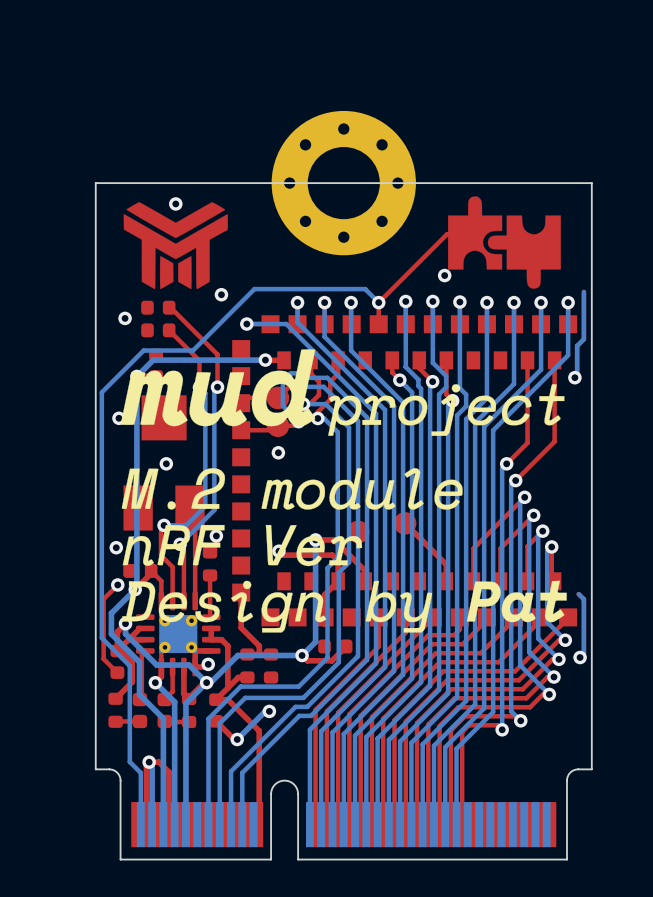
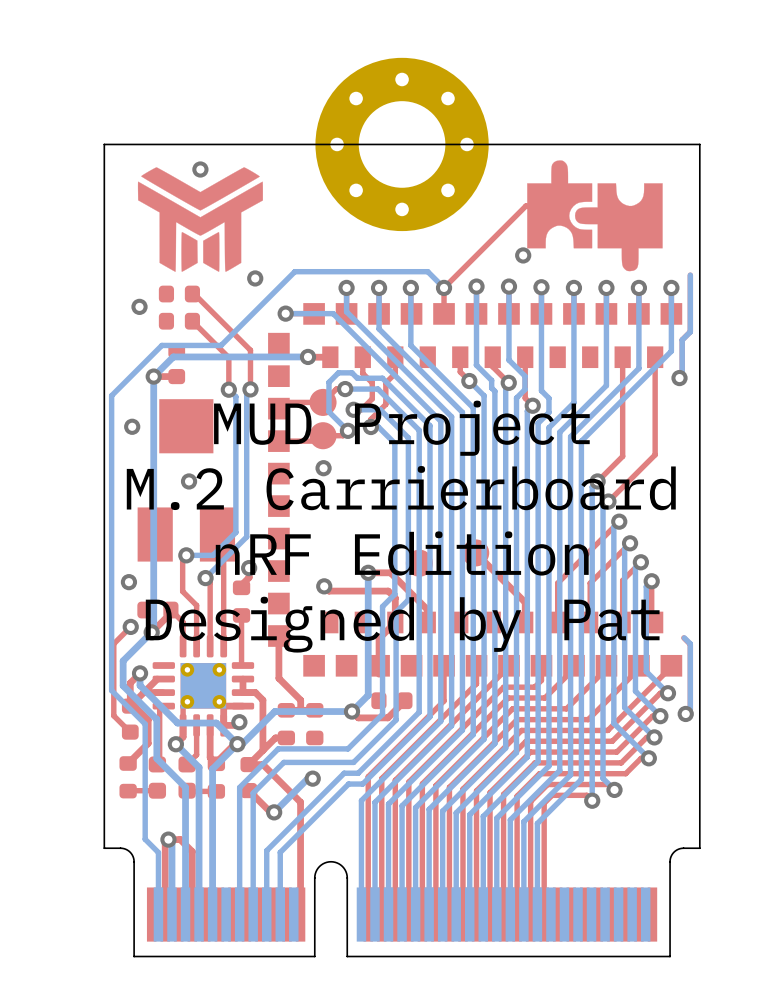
drawing: [120, 349, 567, 633] -> none
text: none -> MUD Project (401, 428)
text: none -> M.2 Carrierboard (401, 488)
text: none -> nRF Edition (402, 553)
text: none -> Designed by Pat (402, 624)

